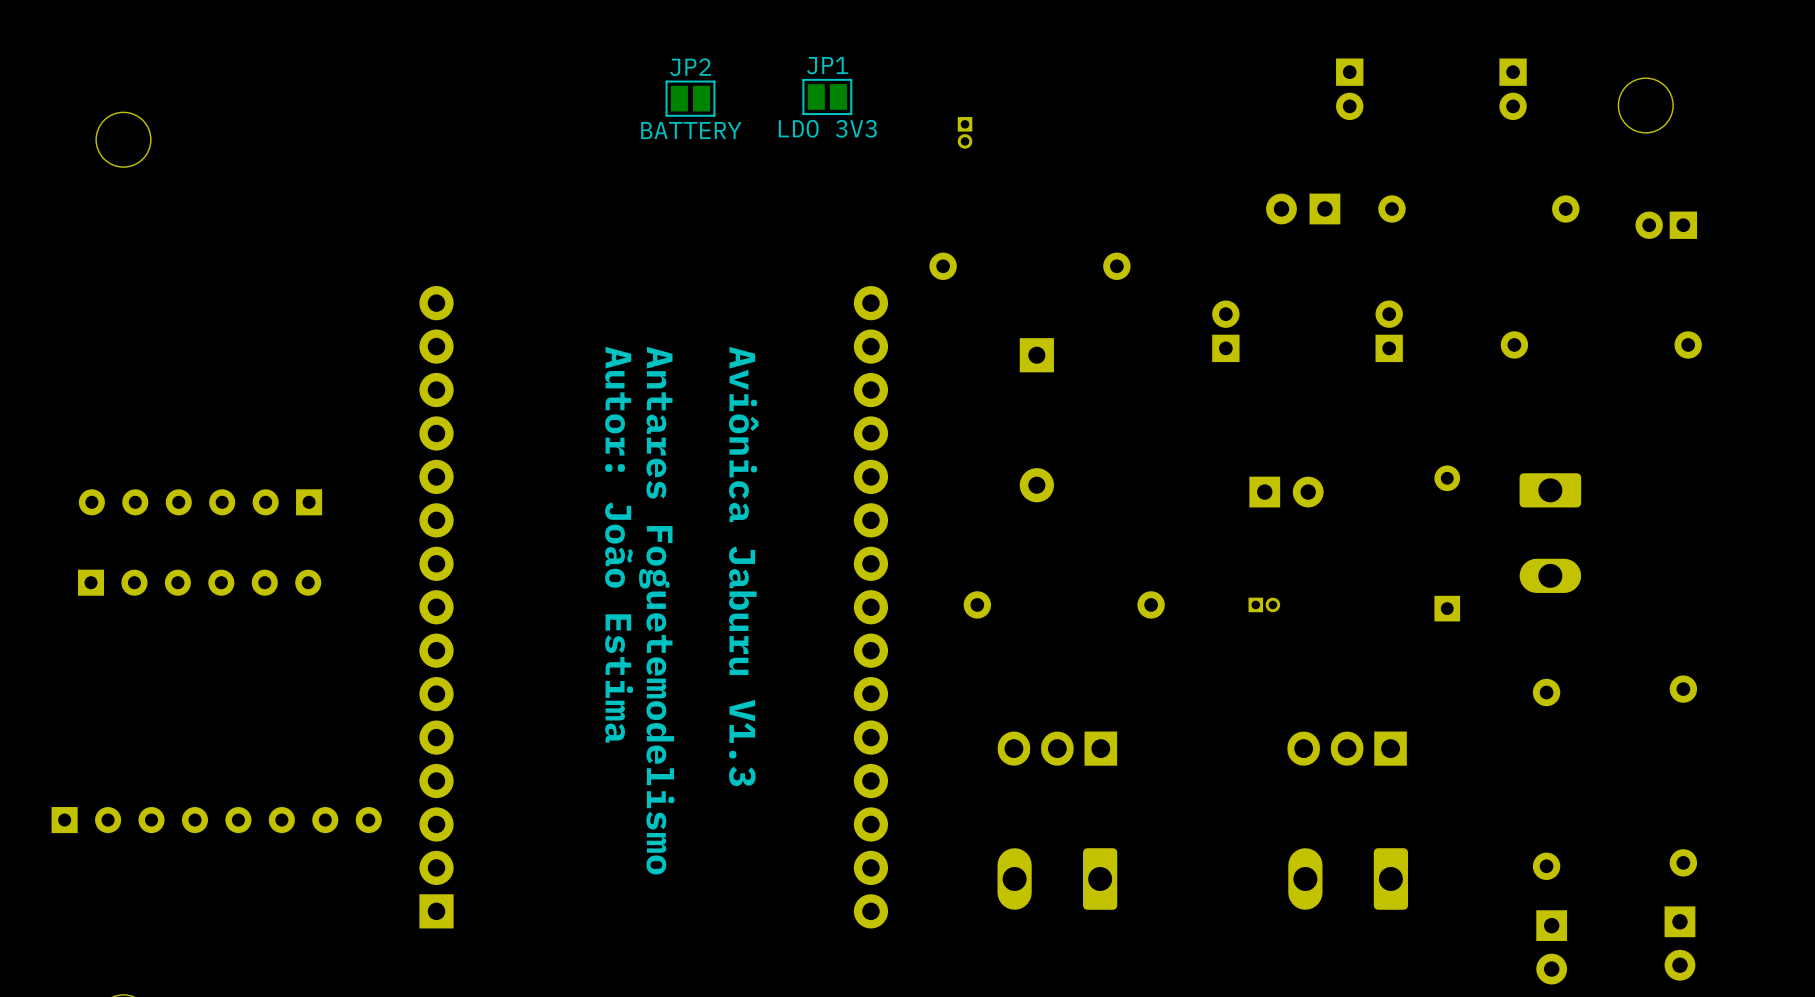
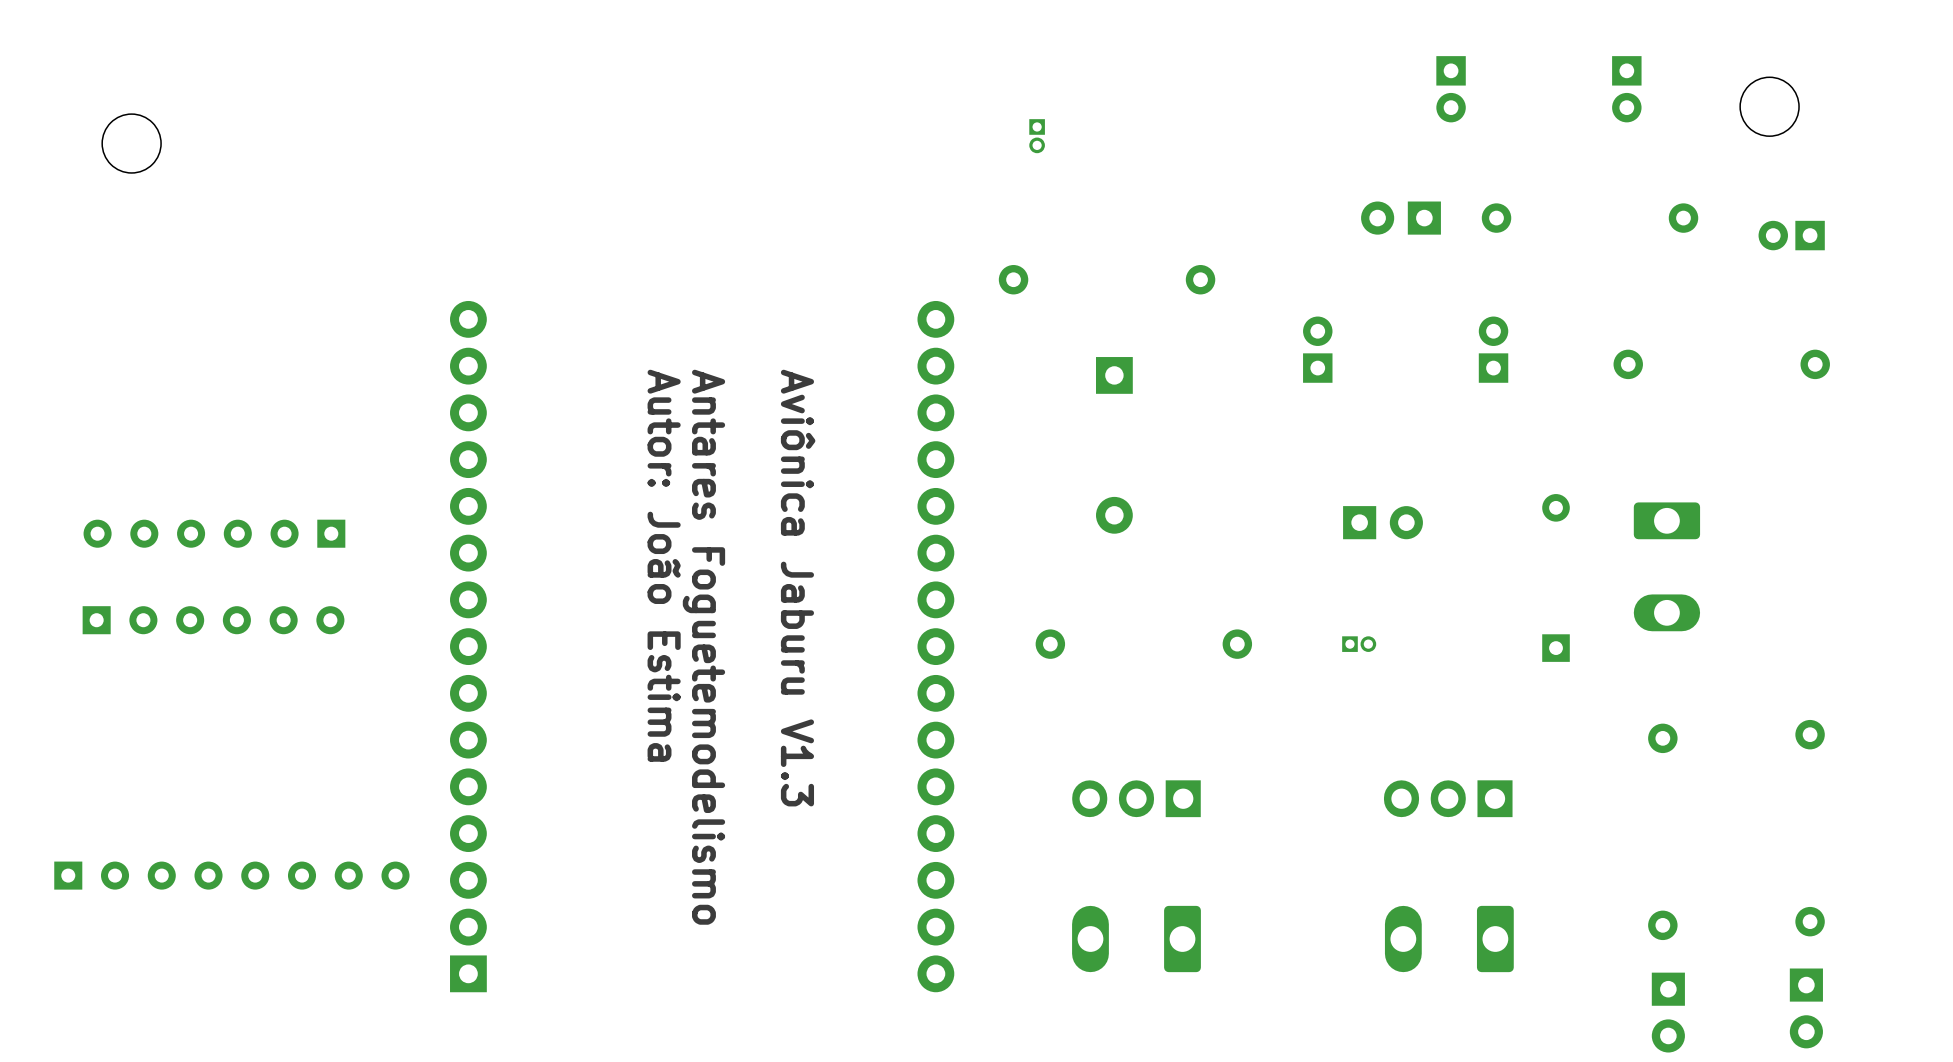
JP1: LDO 3V3 (827, 96) -> none
JP2: BATTERY (690, 98) -> none

